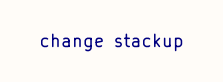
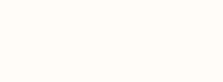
text: change stackup (111, 42) -> none

